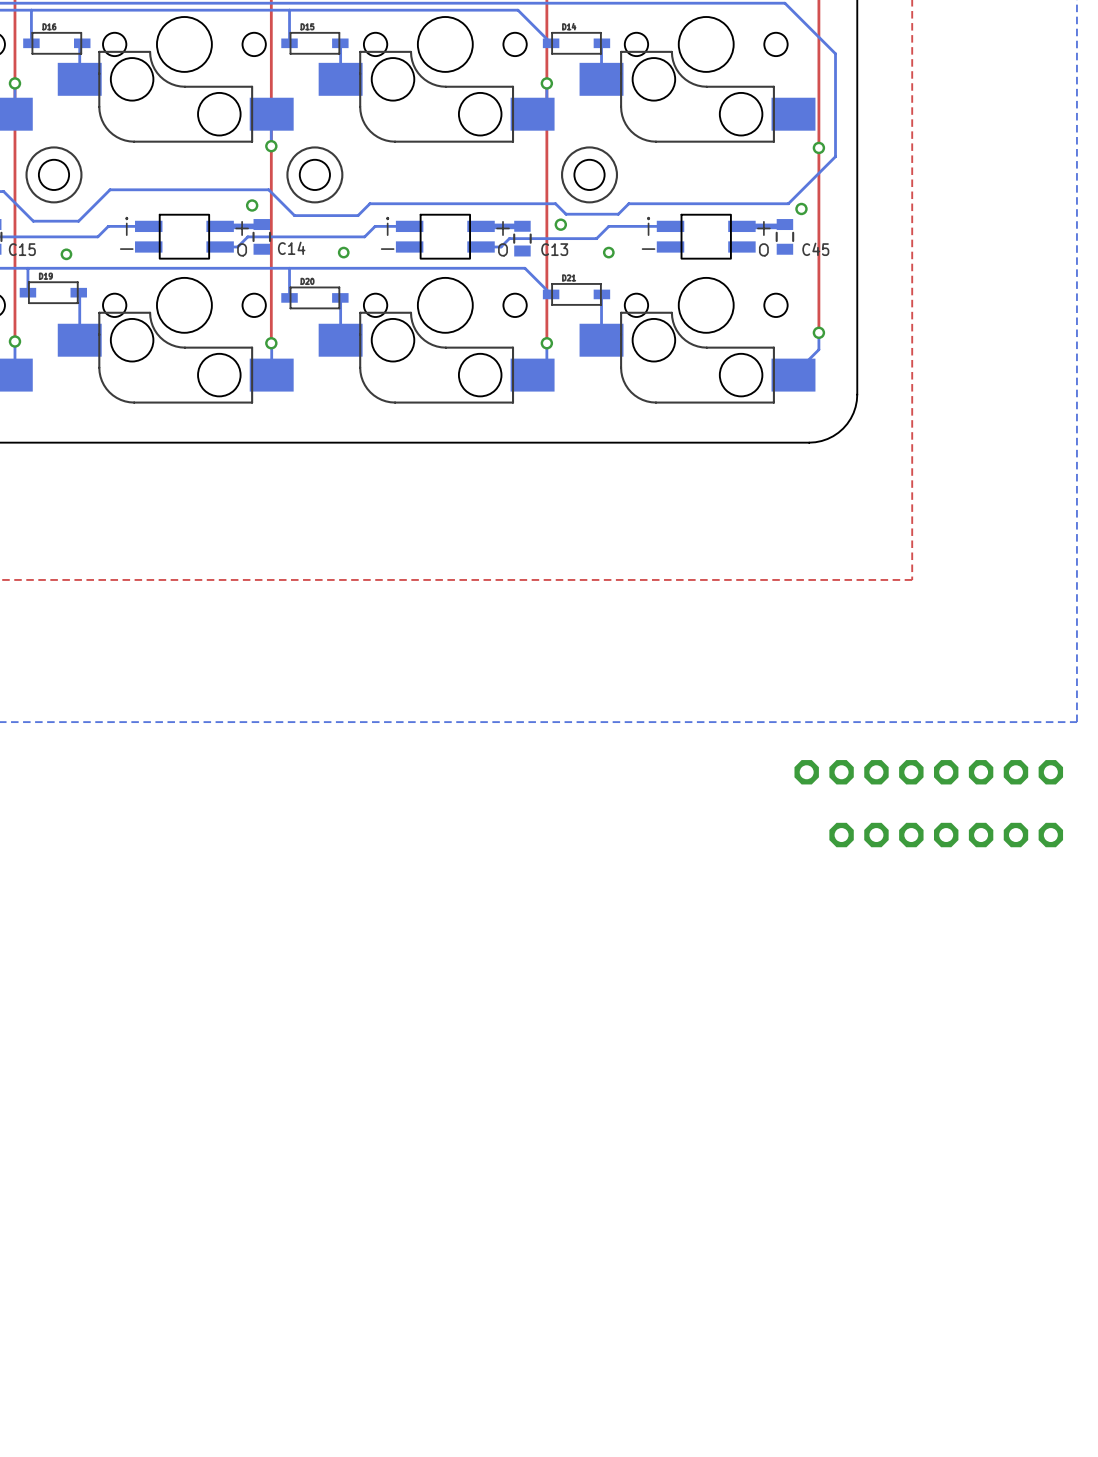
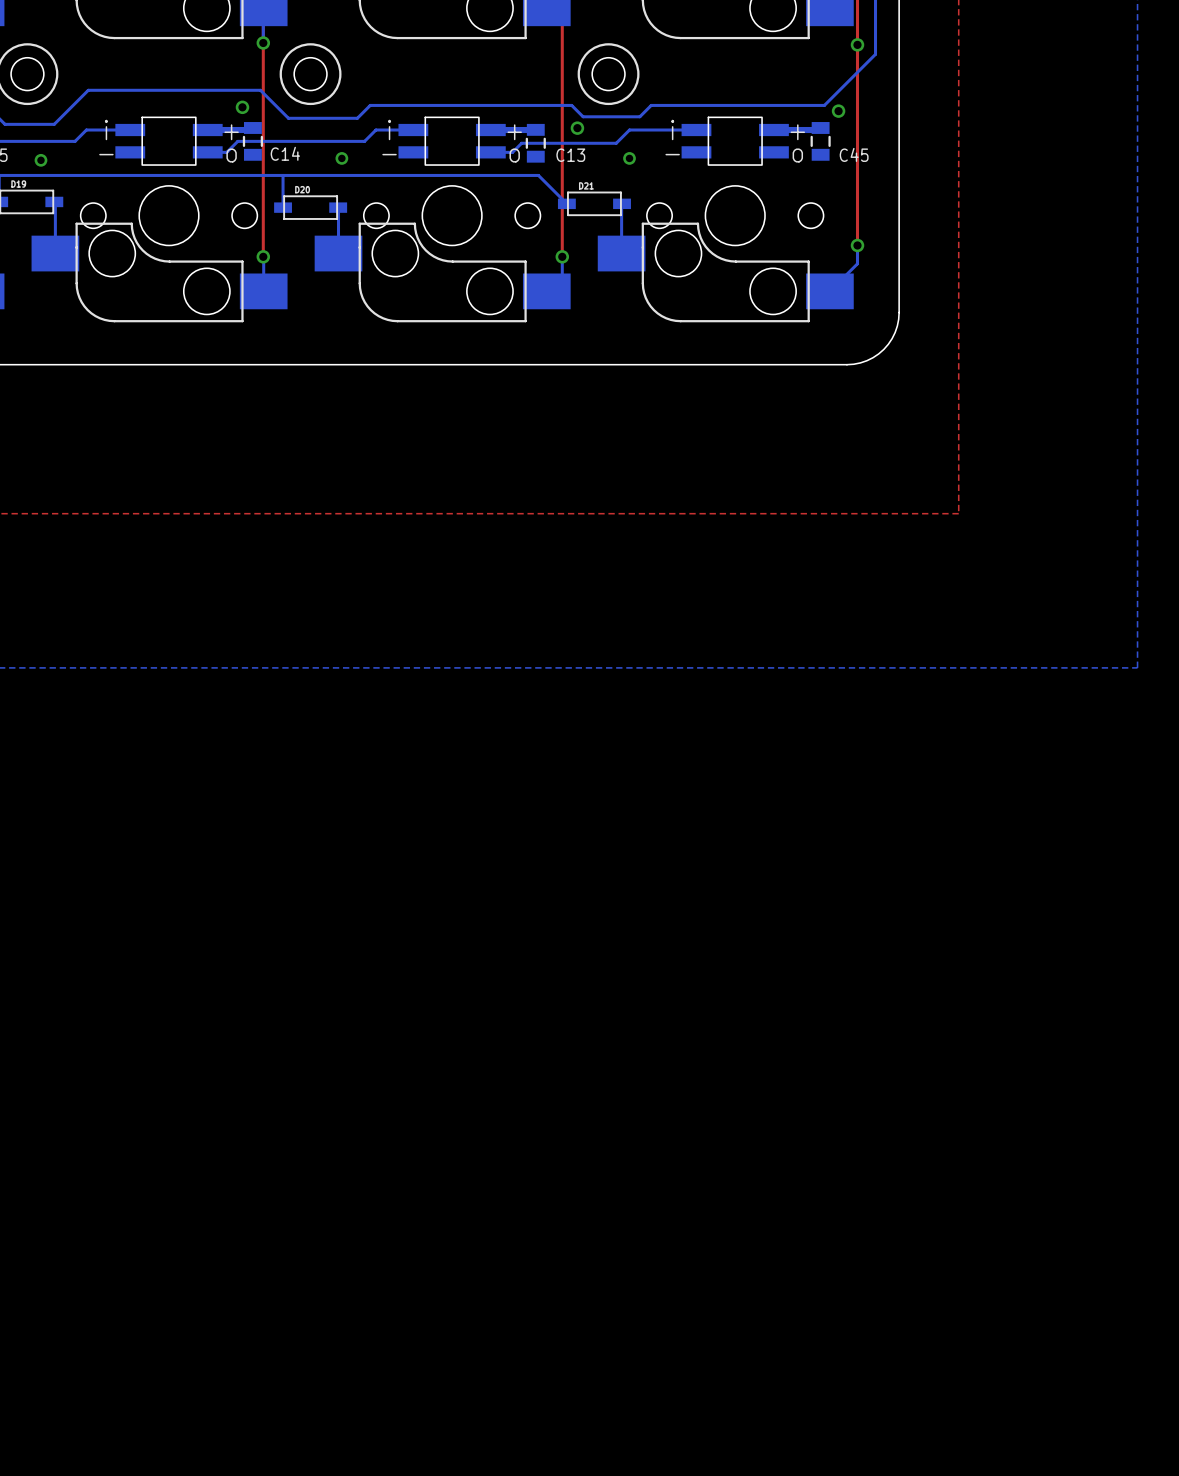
part: (928, 772) -> none
part: (946, 835) -> none

